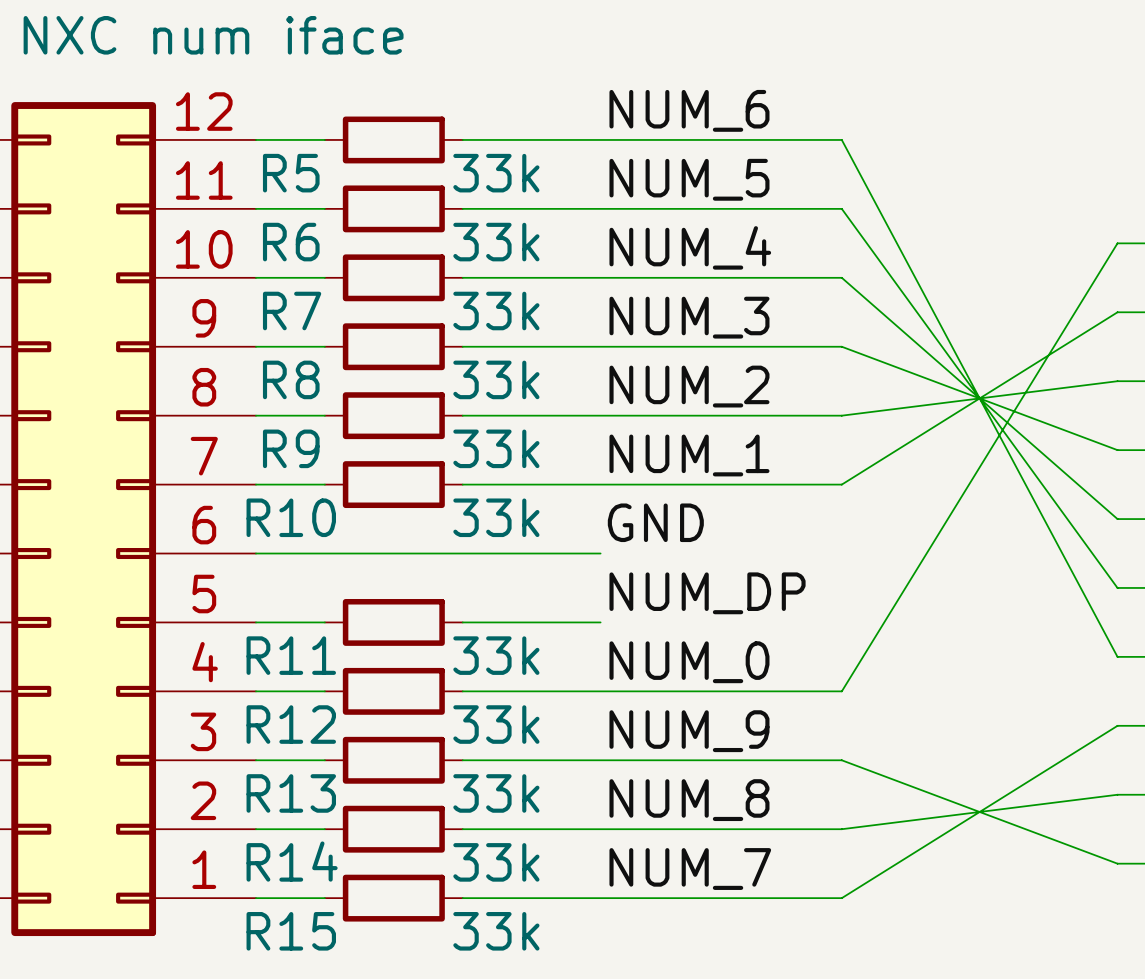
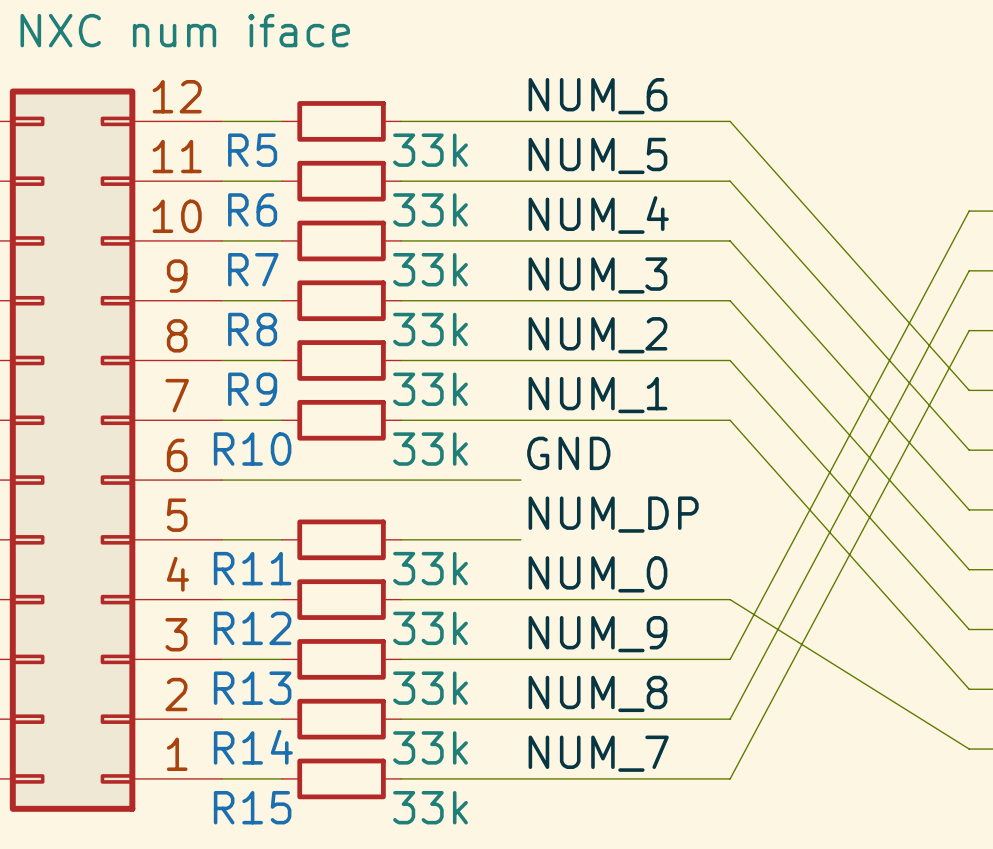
wire: (841, 139) (1117, 656) -> (730, 121) (969, 390)
wire: (841, 208) (1117, 587) -> (730, 181) (969, 450)
wire: (1117, 243) (841, 691) -> (969, 211) (730, 659)
wire: (841, 277) (1117, 519) -> (730, 240) (969, 509)
wire: (1117, 312) (841, 484) -> (969, 270) (730, 719)
wire: (841, 346) (1117, 450) -> (730, 300) (969, 569)
wire: (1117, 381) (841, 415) -> (969, 629) (730, 360)
wire: (1117, 725) (841, 898) -> (969, 330) (730, 778)
wire: (841, 760) (1117, 863) -> (730, 599) (969, 749)
wire: (1117, 794) (841, 829) -> (969, 689) (730, 420)

